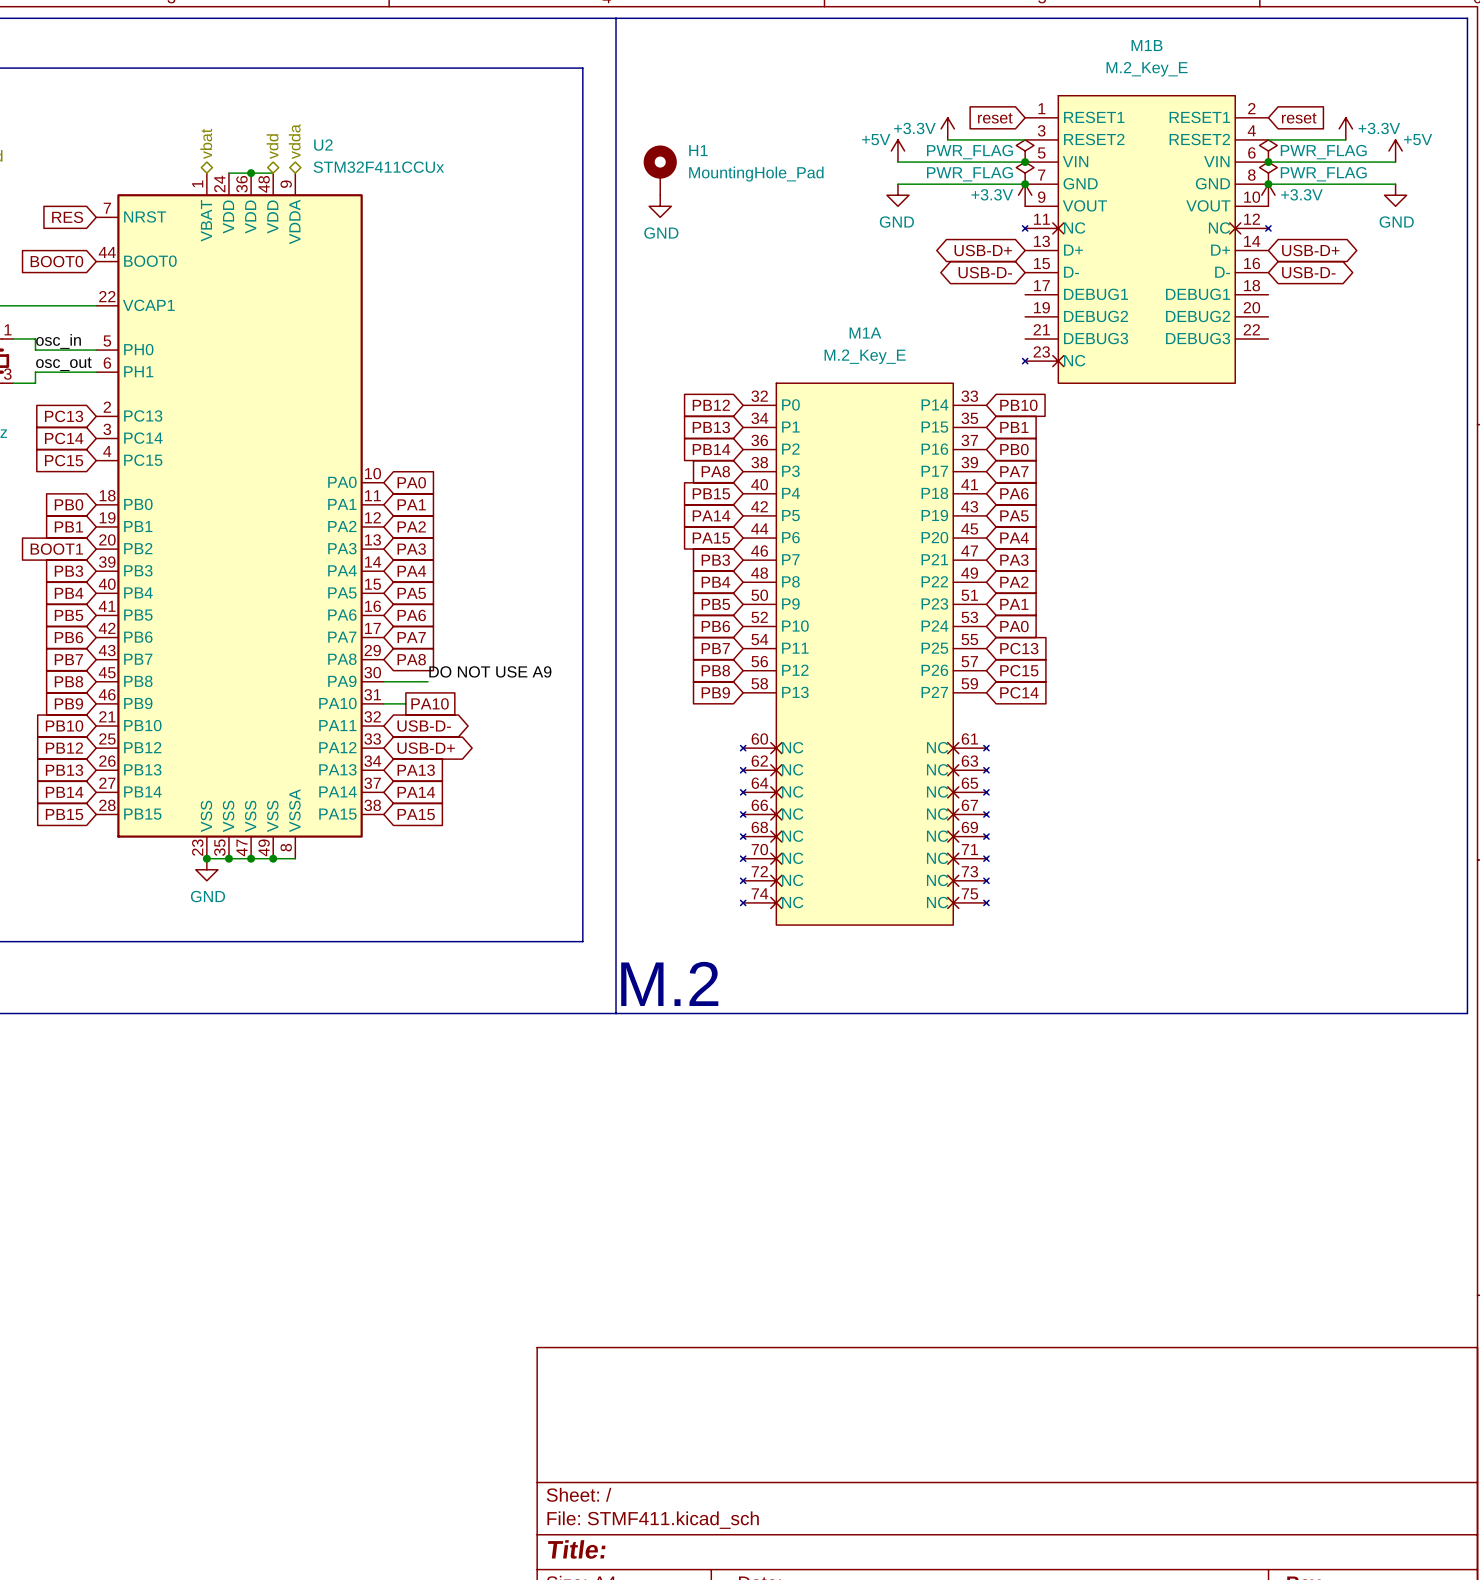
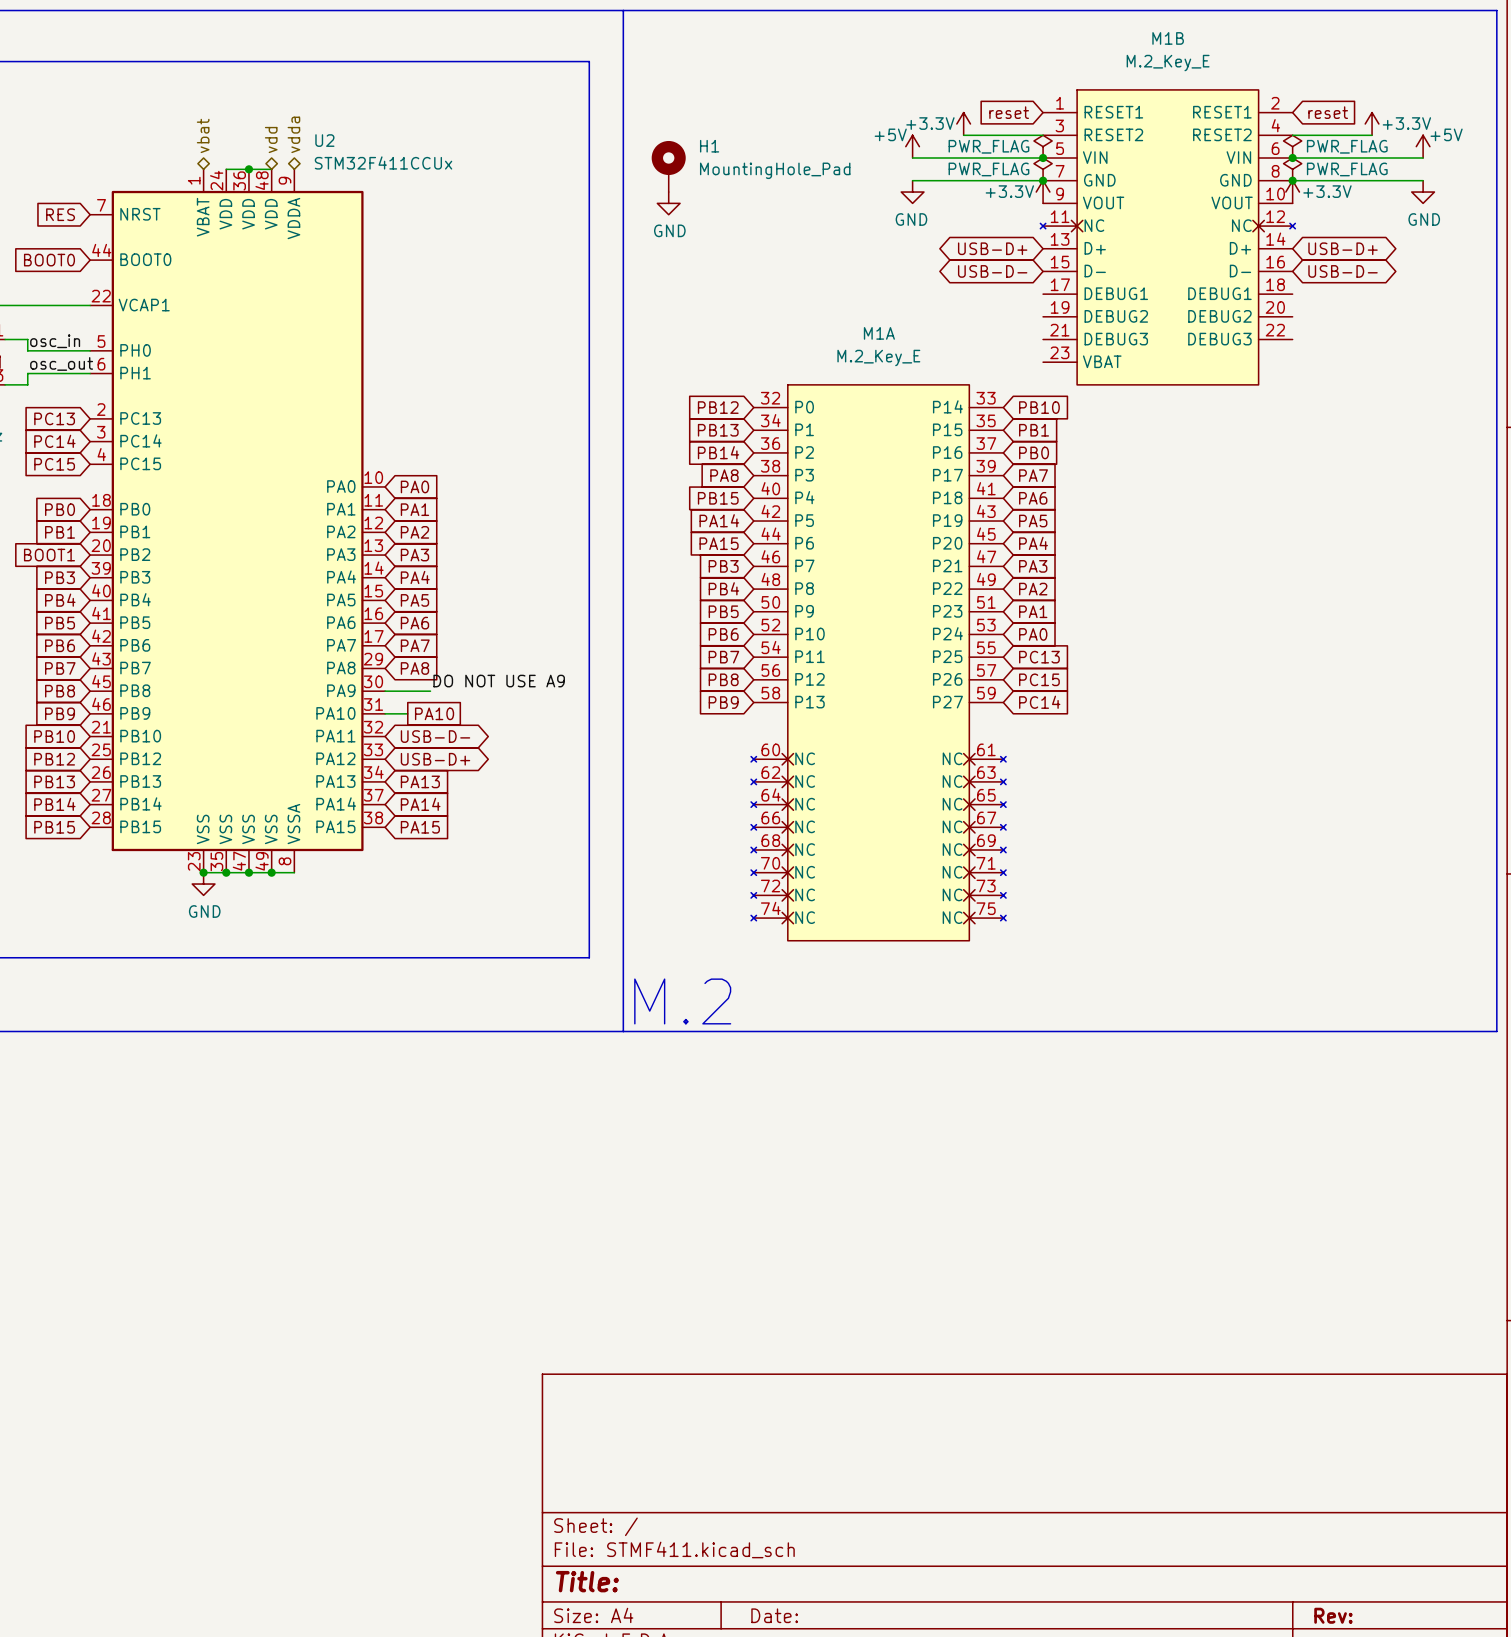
M1B symbol: [1022, 95, 1272, 384] -> [1040, 89, 1296, 386]

